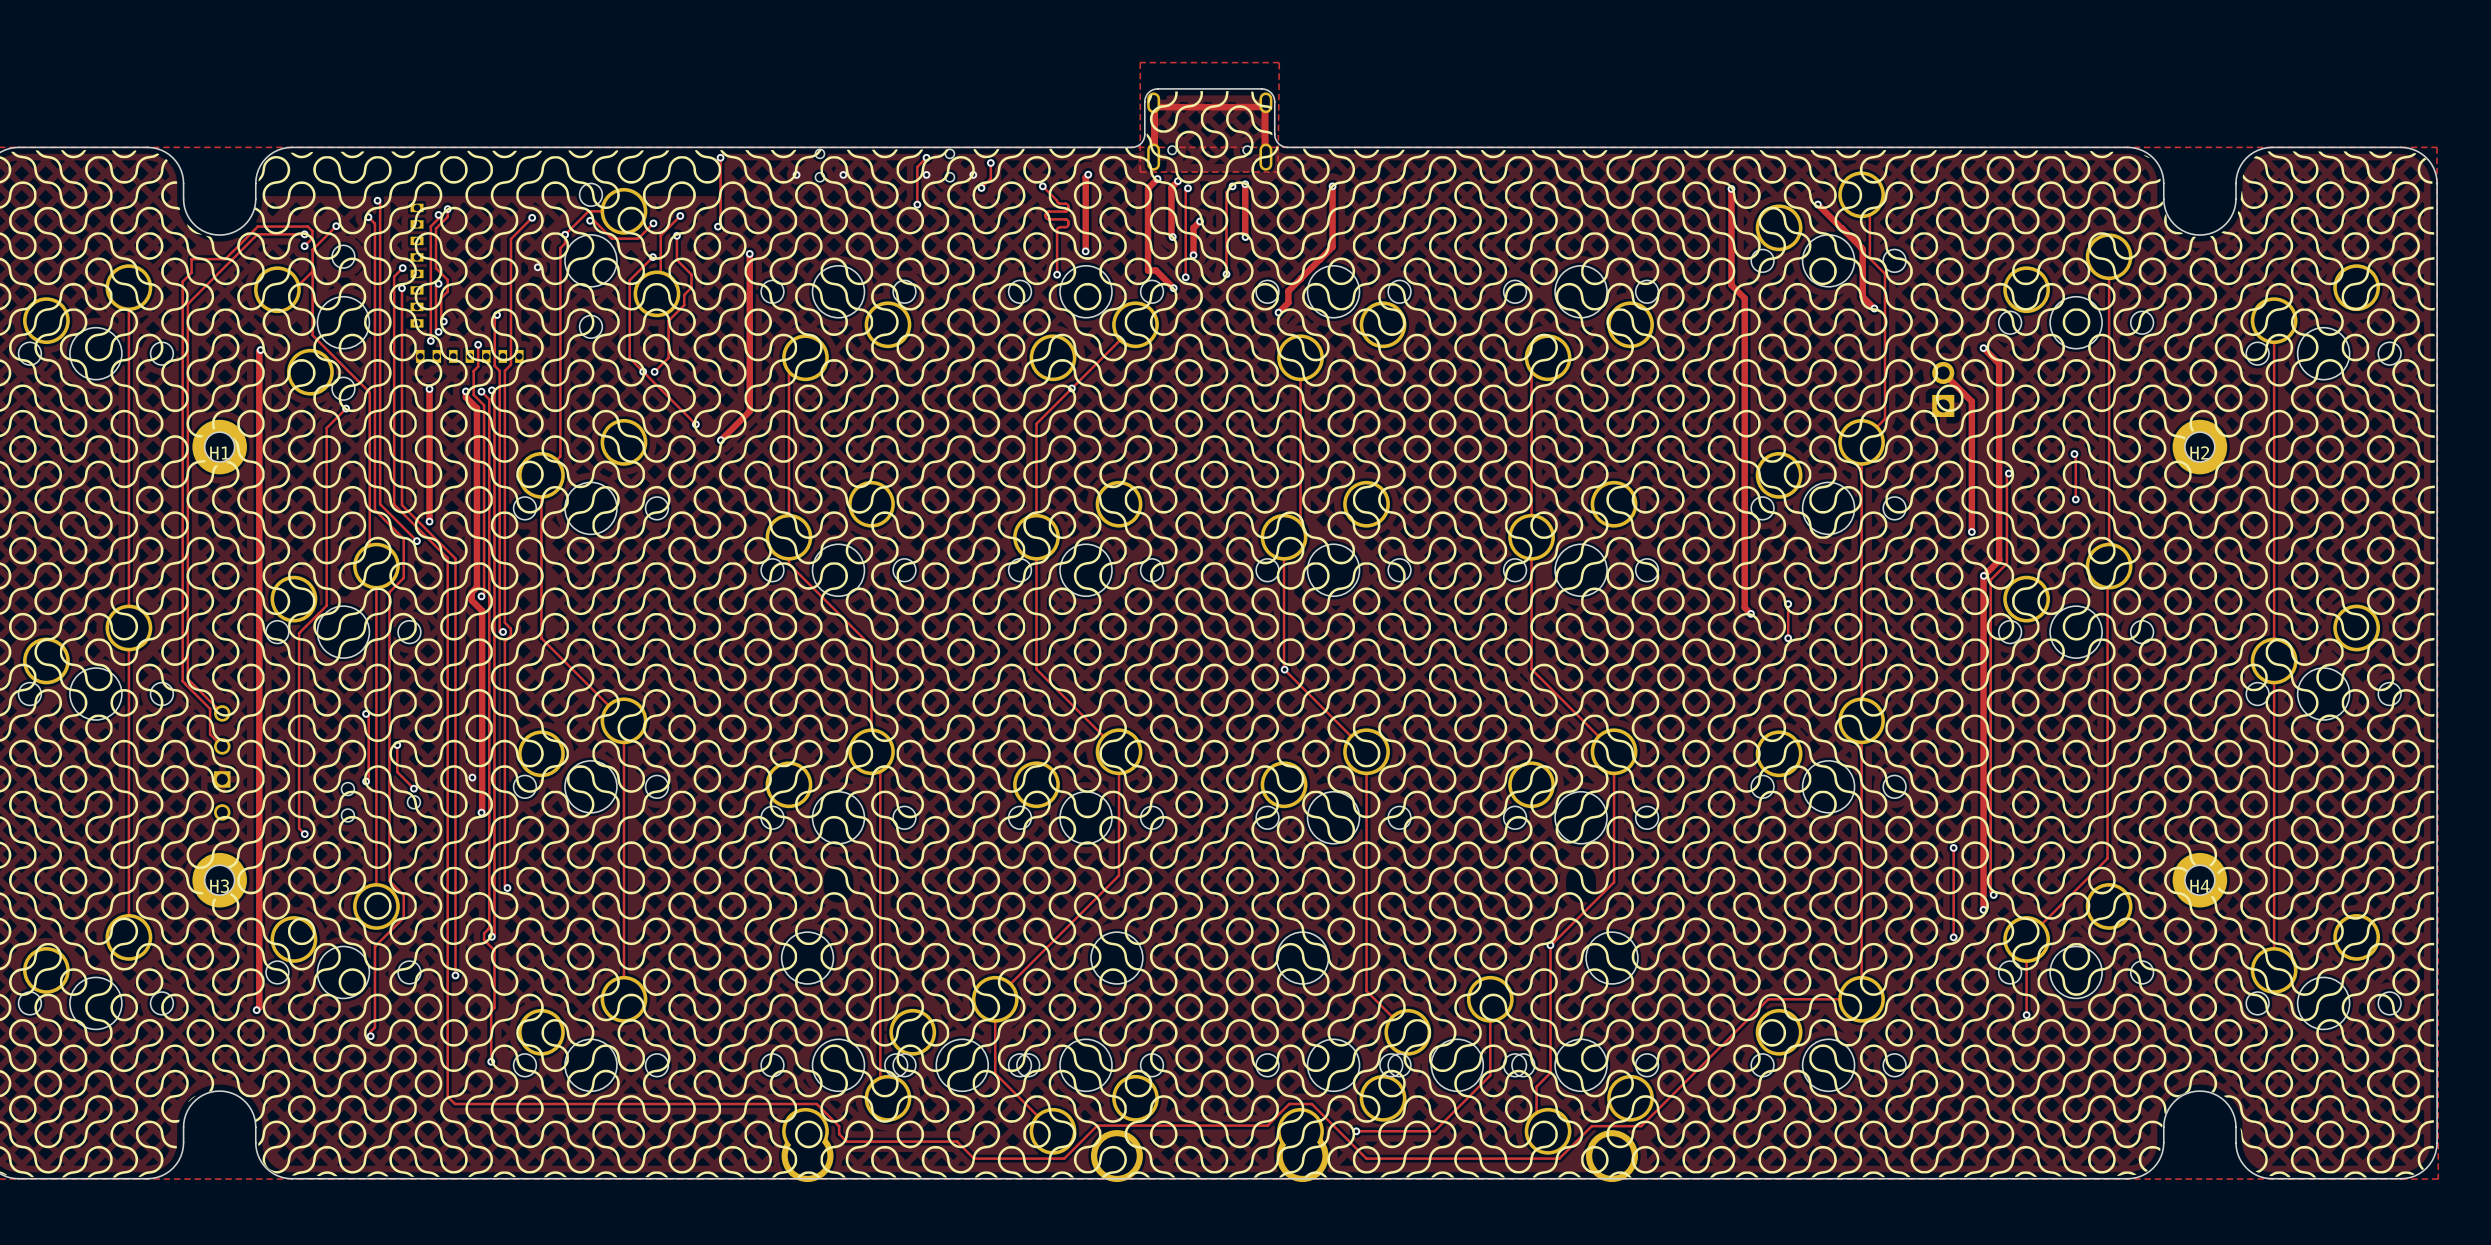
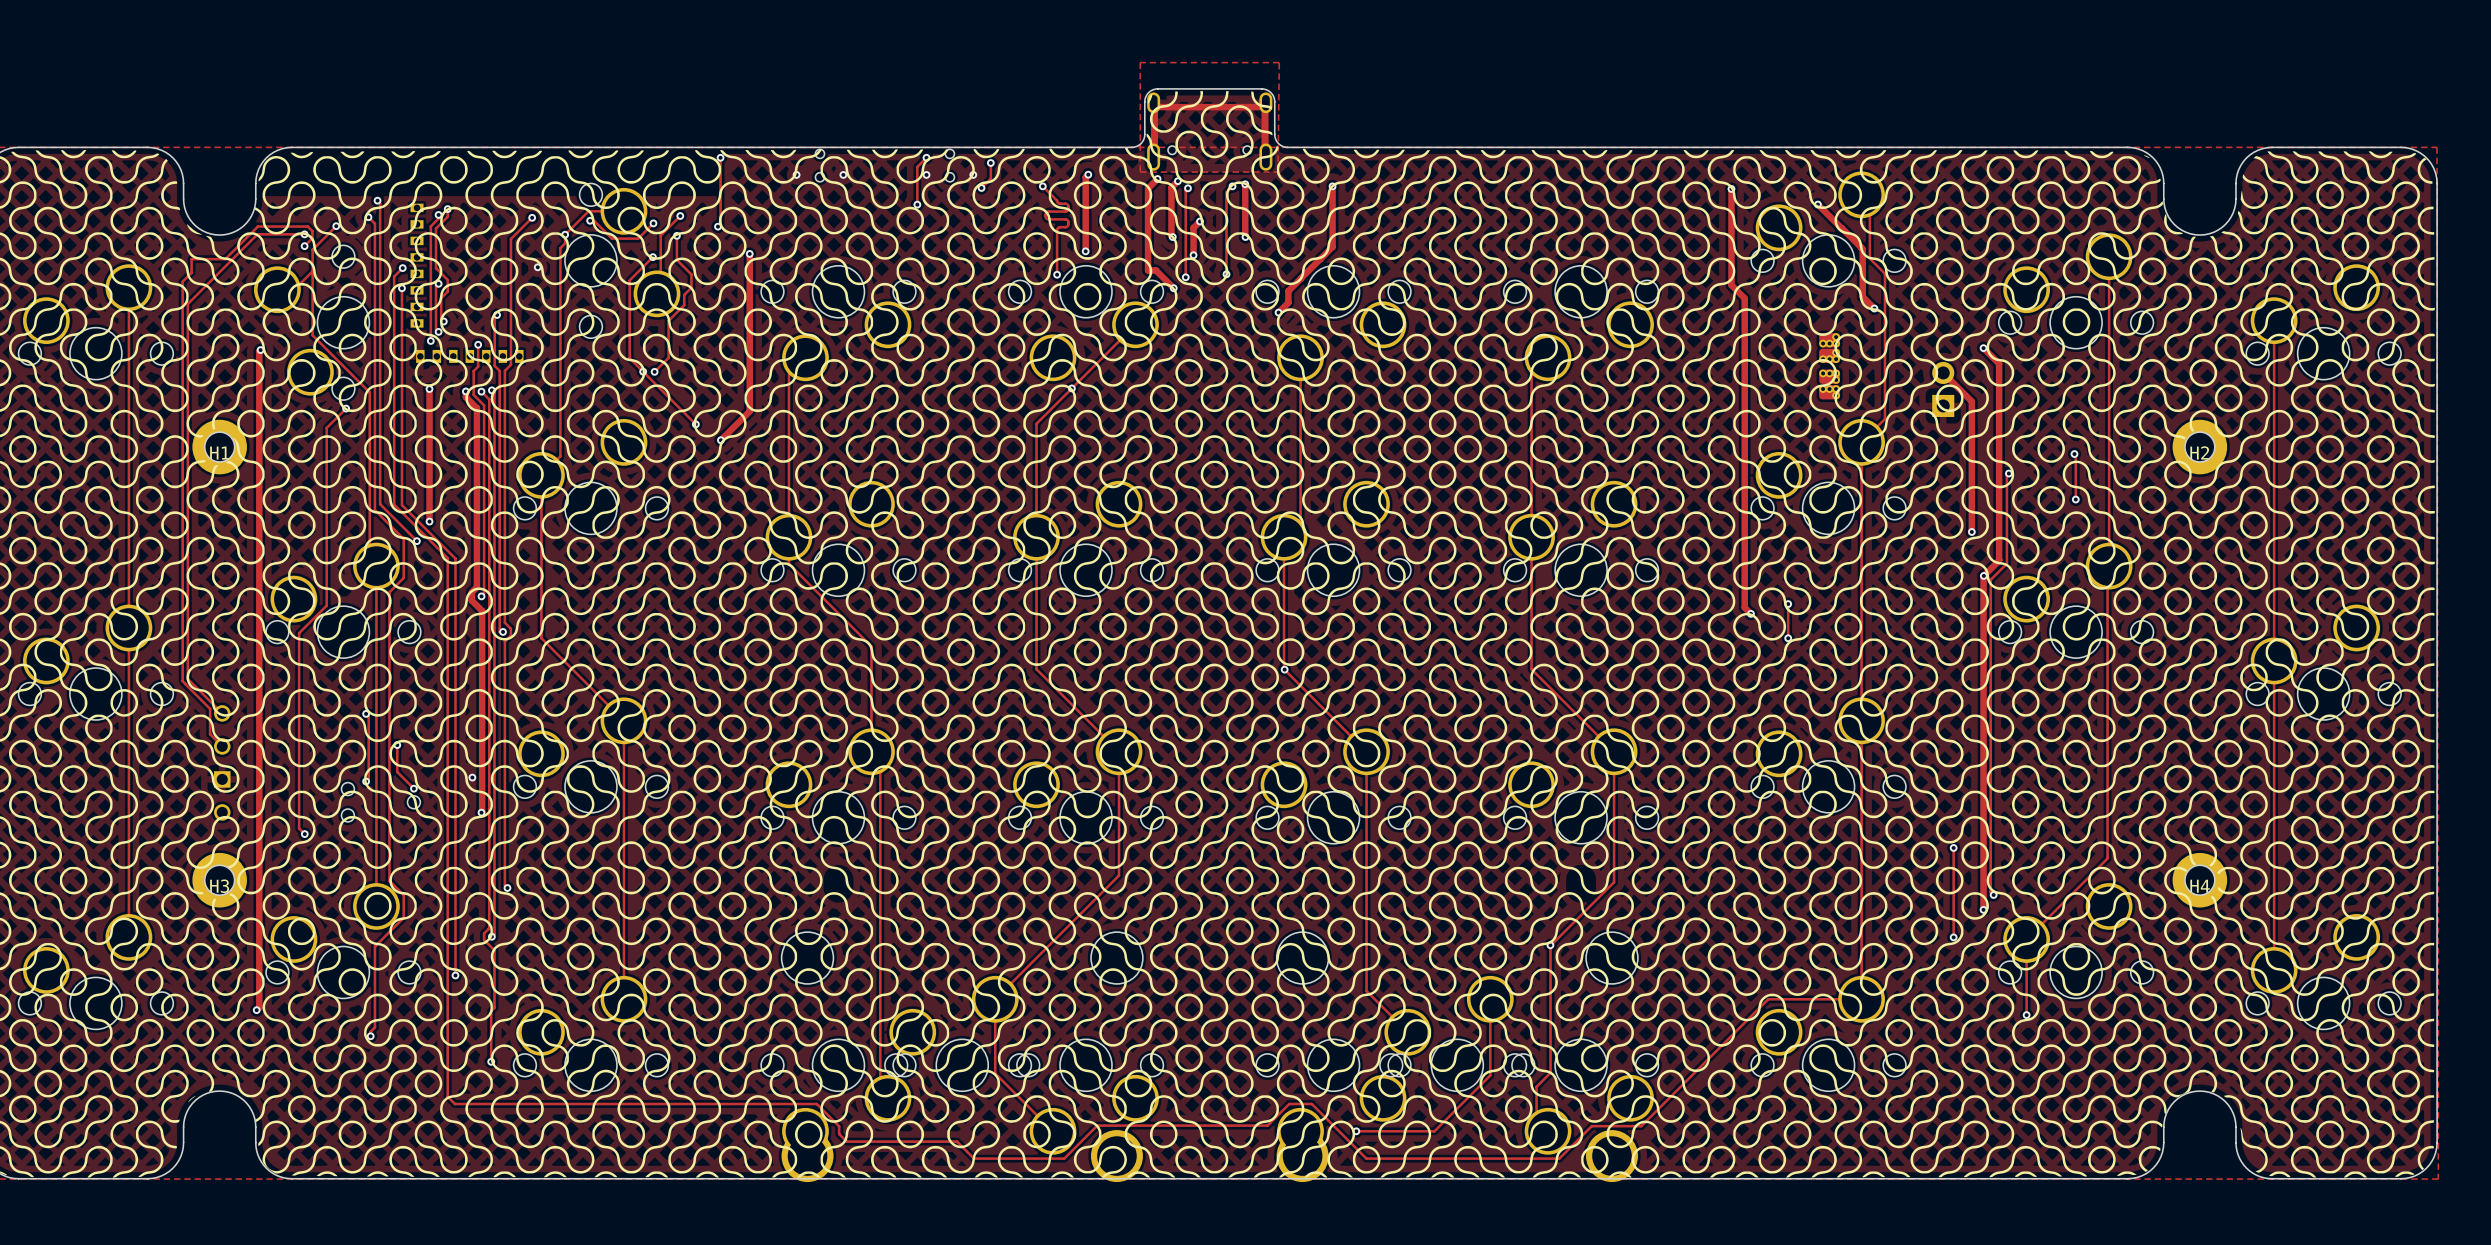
part: none -> (1829, 366)

